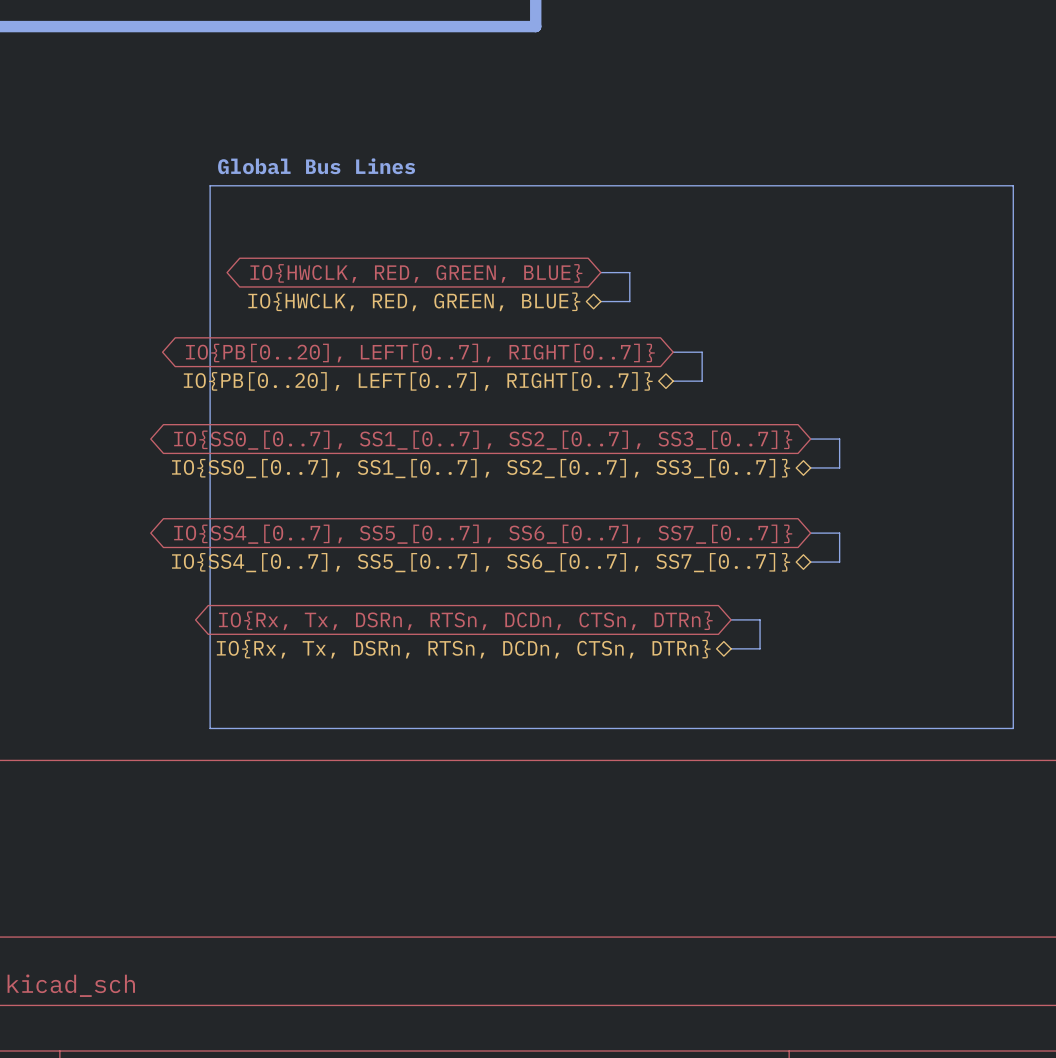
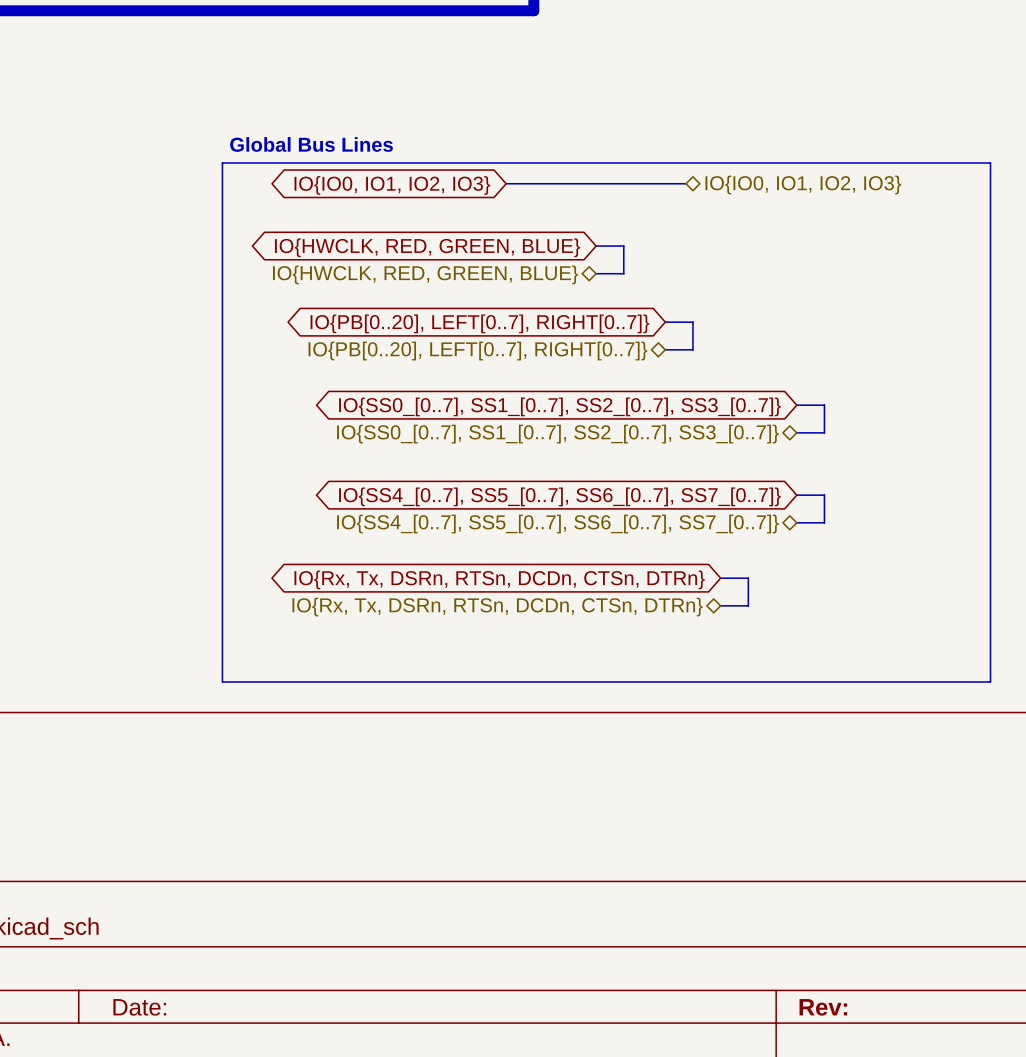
bus: none -> (506, 183) (686, 183)
hierarchical label: none -> IO{IO0, IO1, IO2, IO3} (803, 184)
global label: none -> IO{IO0, IO1, IO2, IO3} (392, 185)

